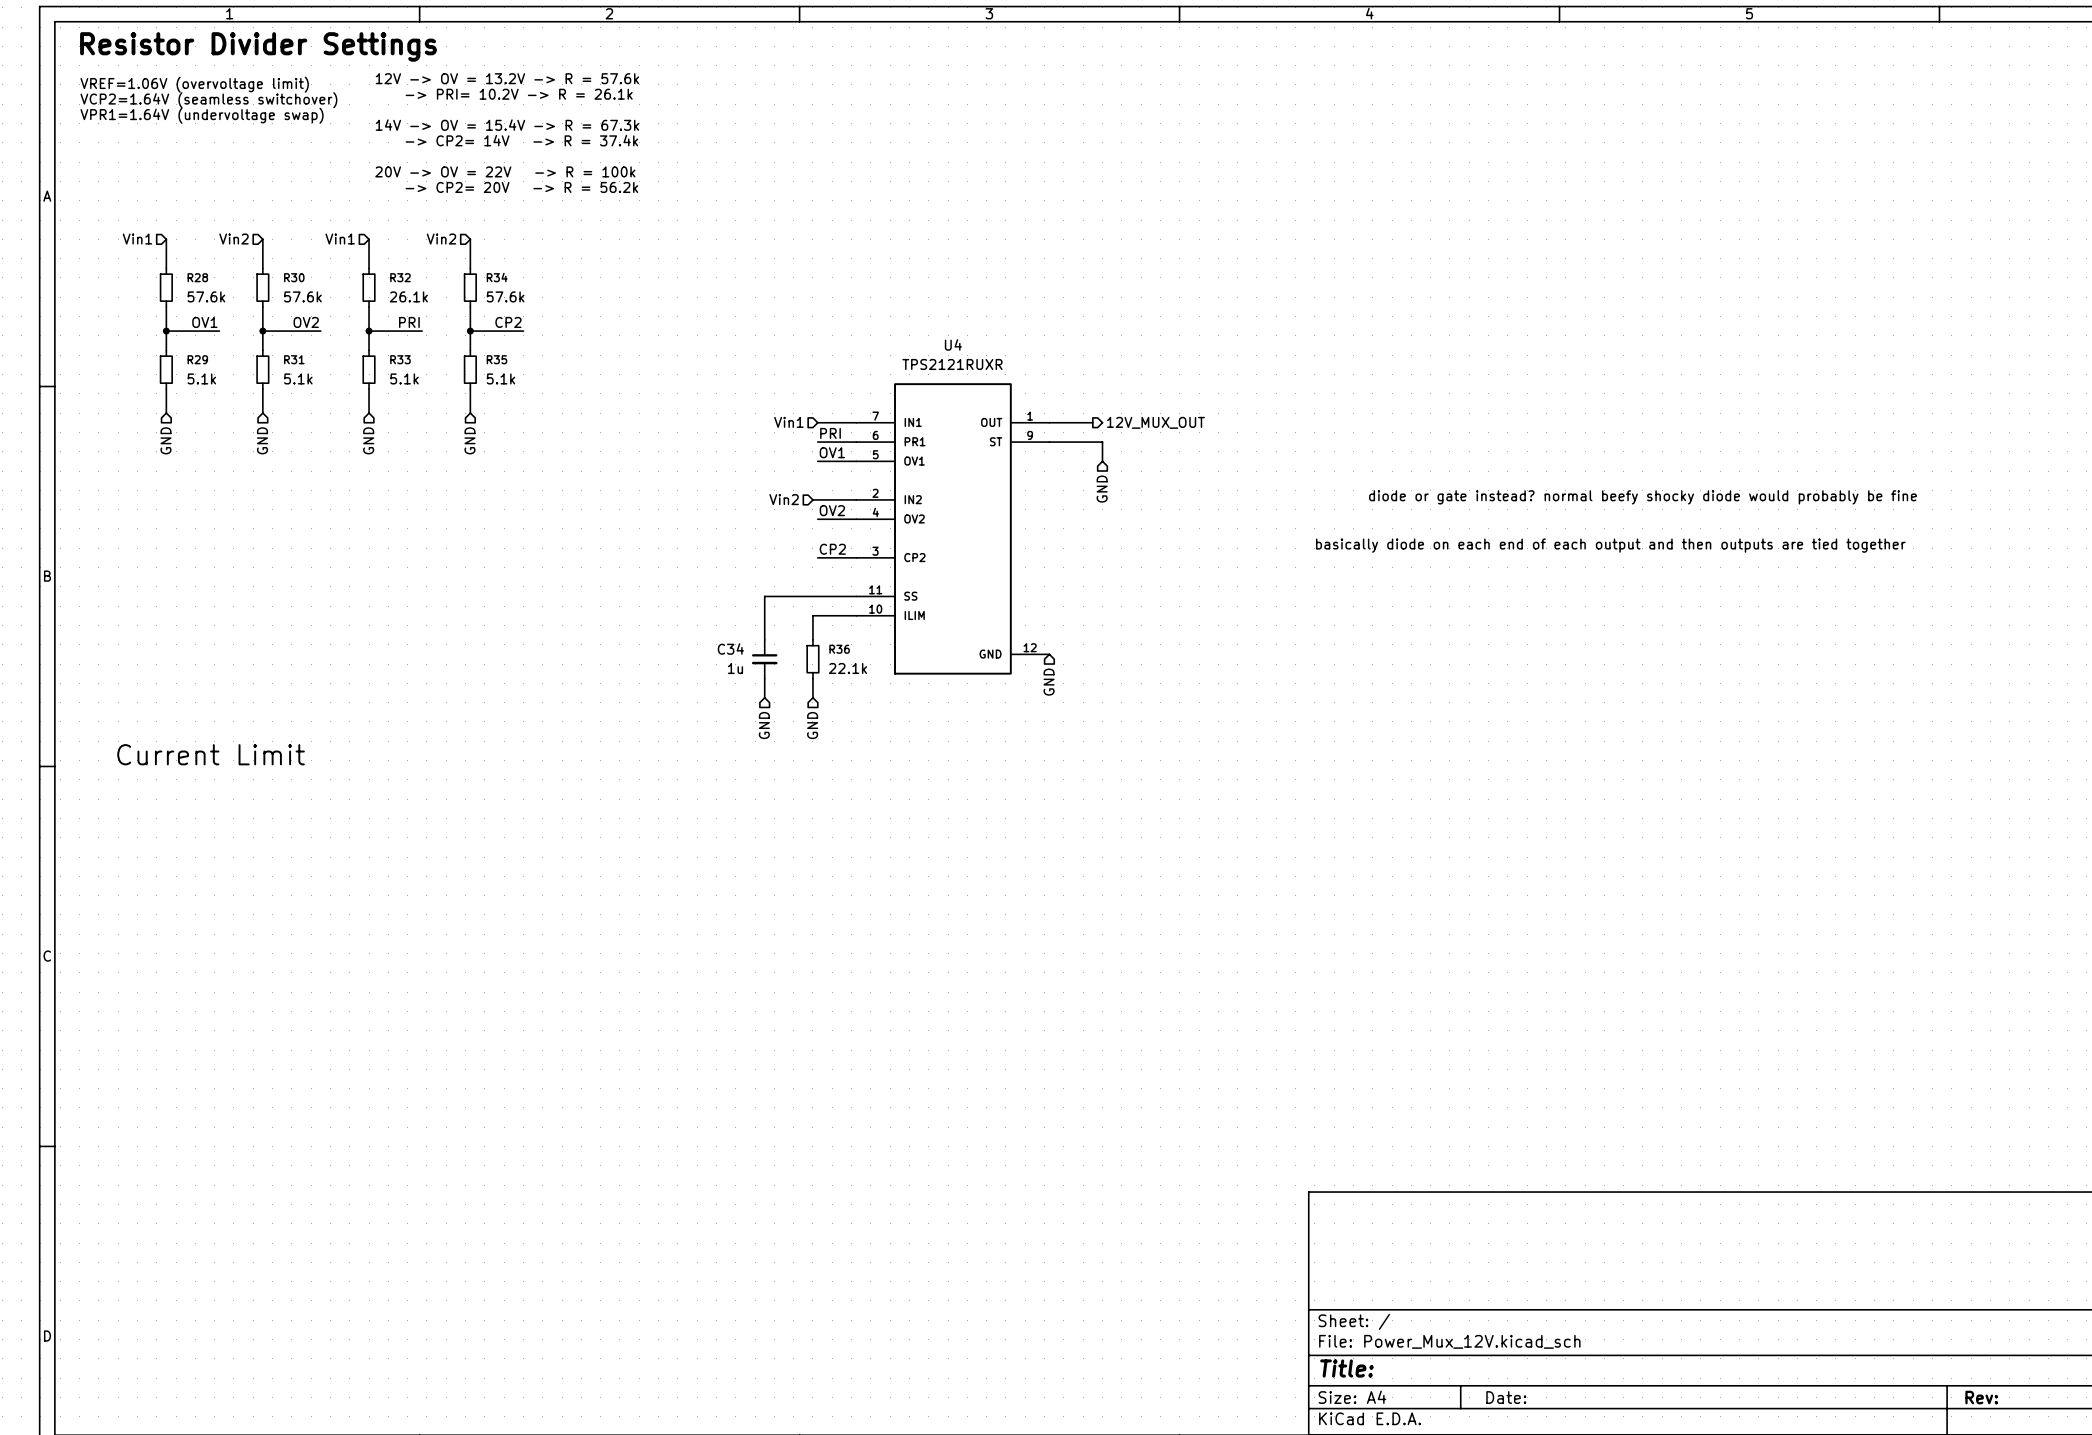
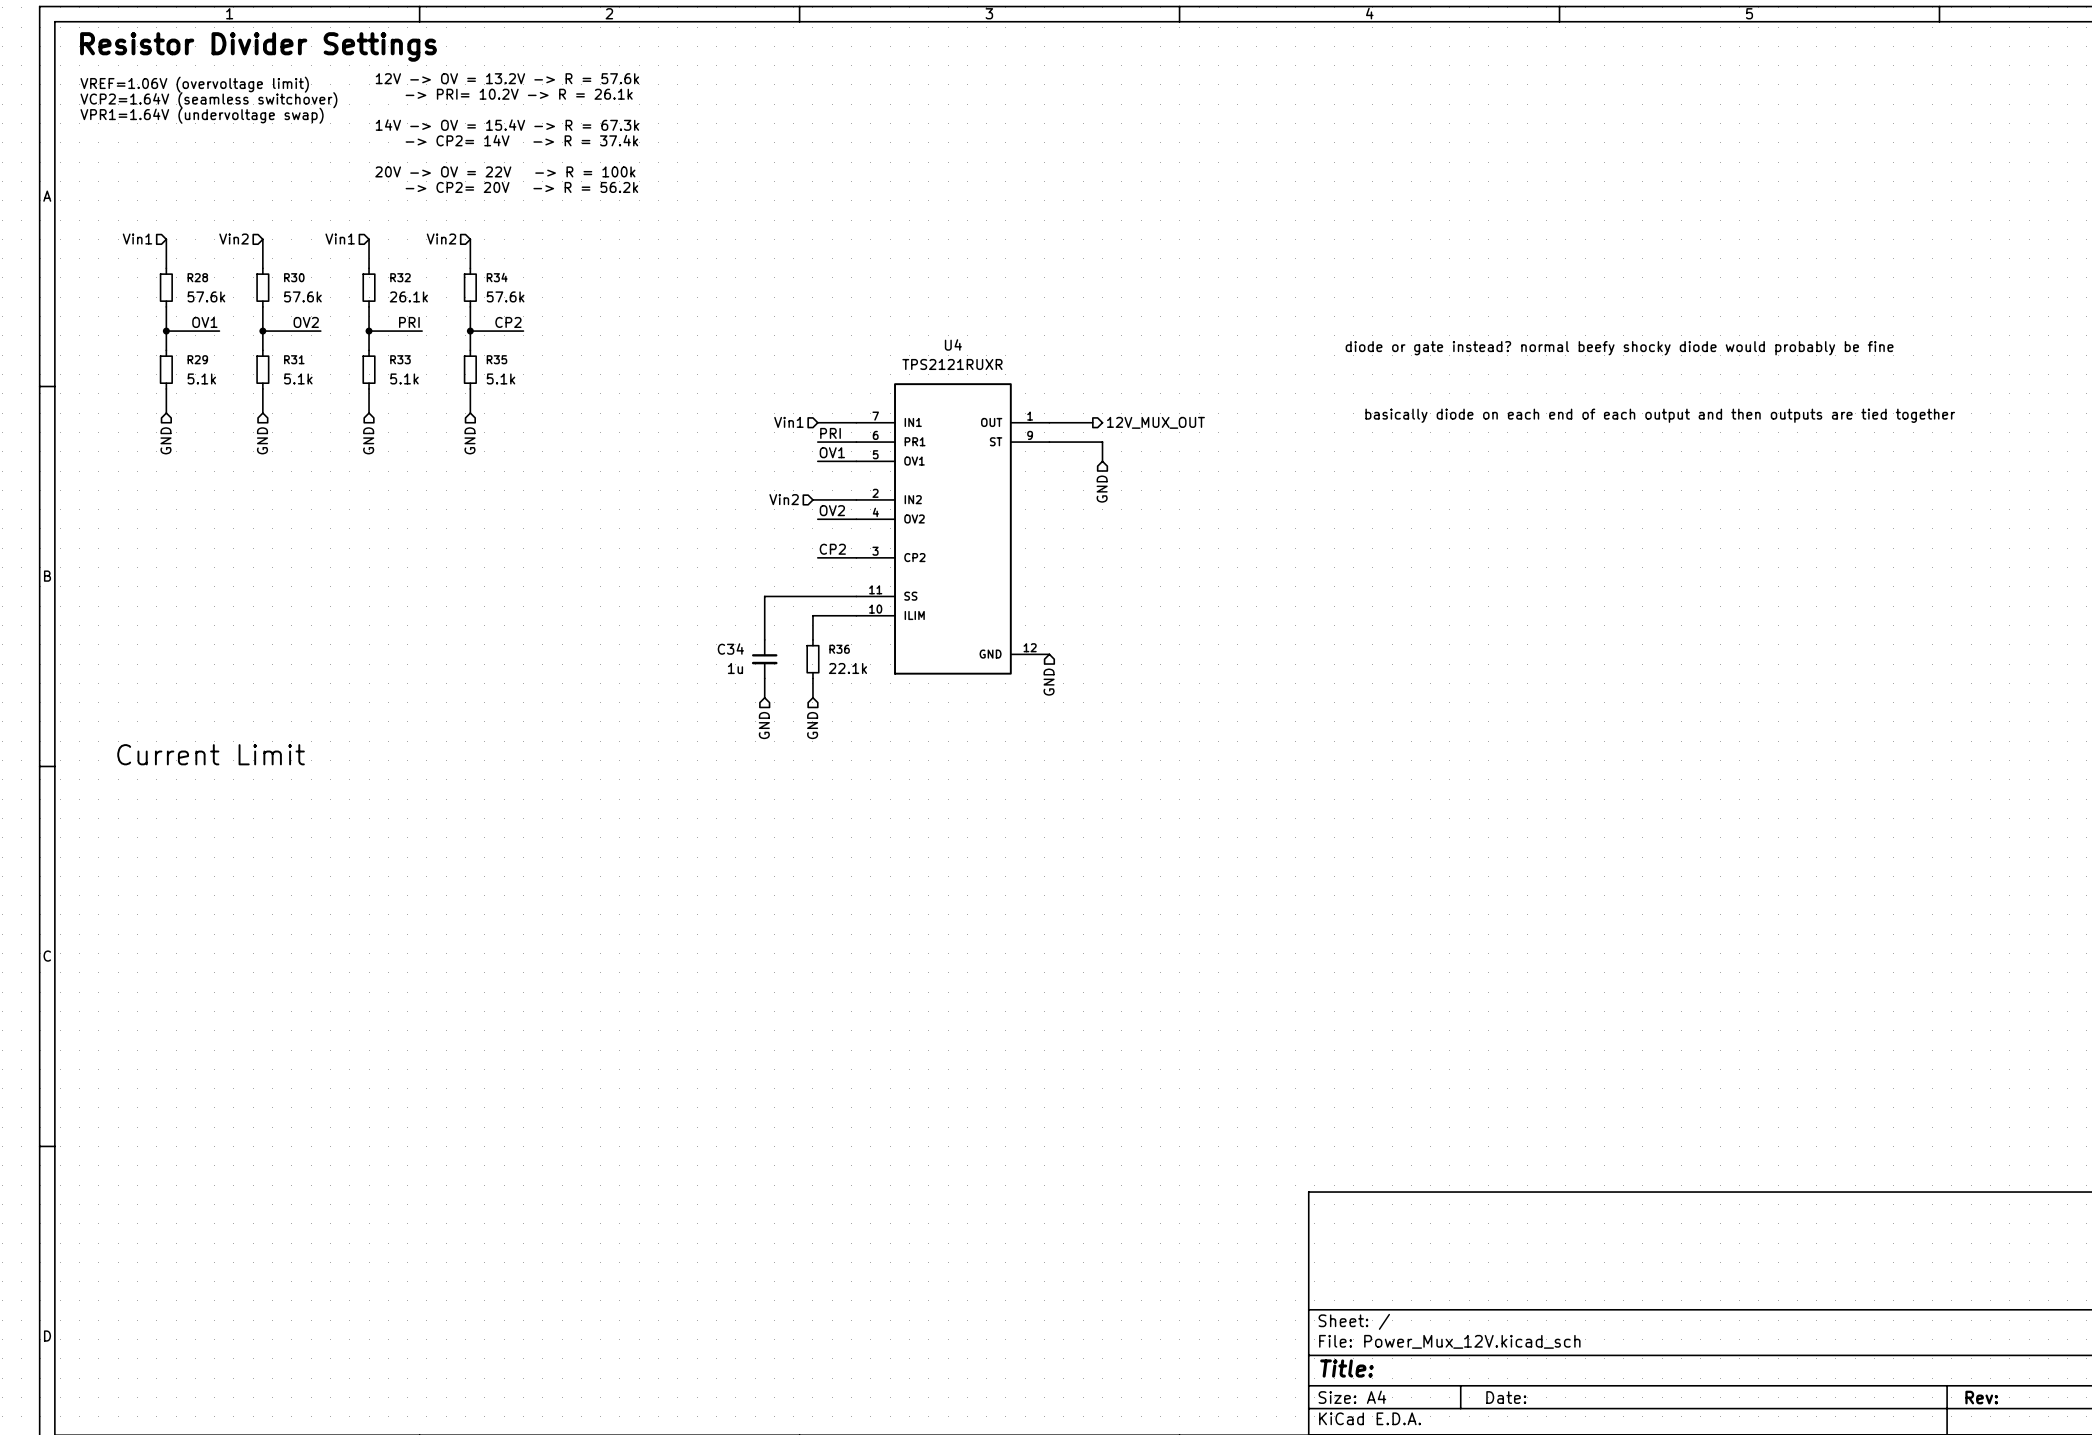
label: none -> diode or gate instead? normal beefy shocky diode would probably be fine (1619, 348)
label: none -> basically diode on each end of each output and then outputs are tied together (1660, 415)
text: diode or gate instead? normal beefy shocky diode would probably be fine (1642, 497) -> none
text: basically diode on each end of each output and then outputs are tied together (1610, 545) -> none

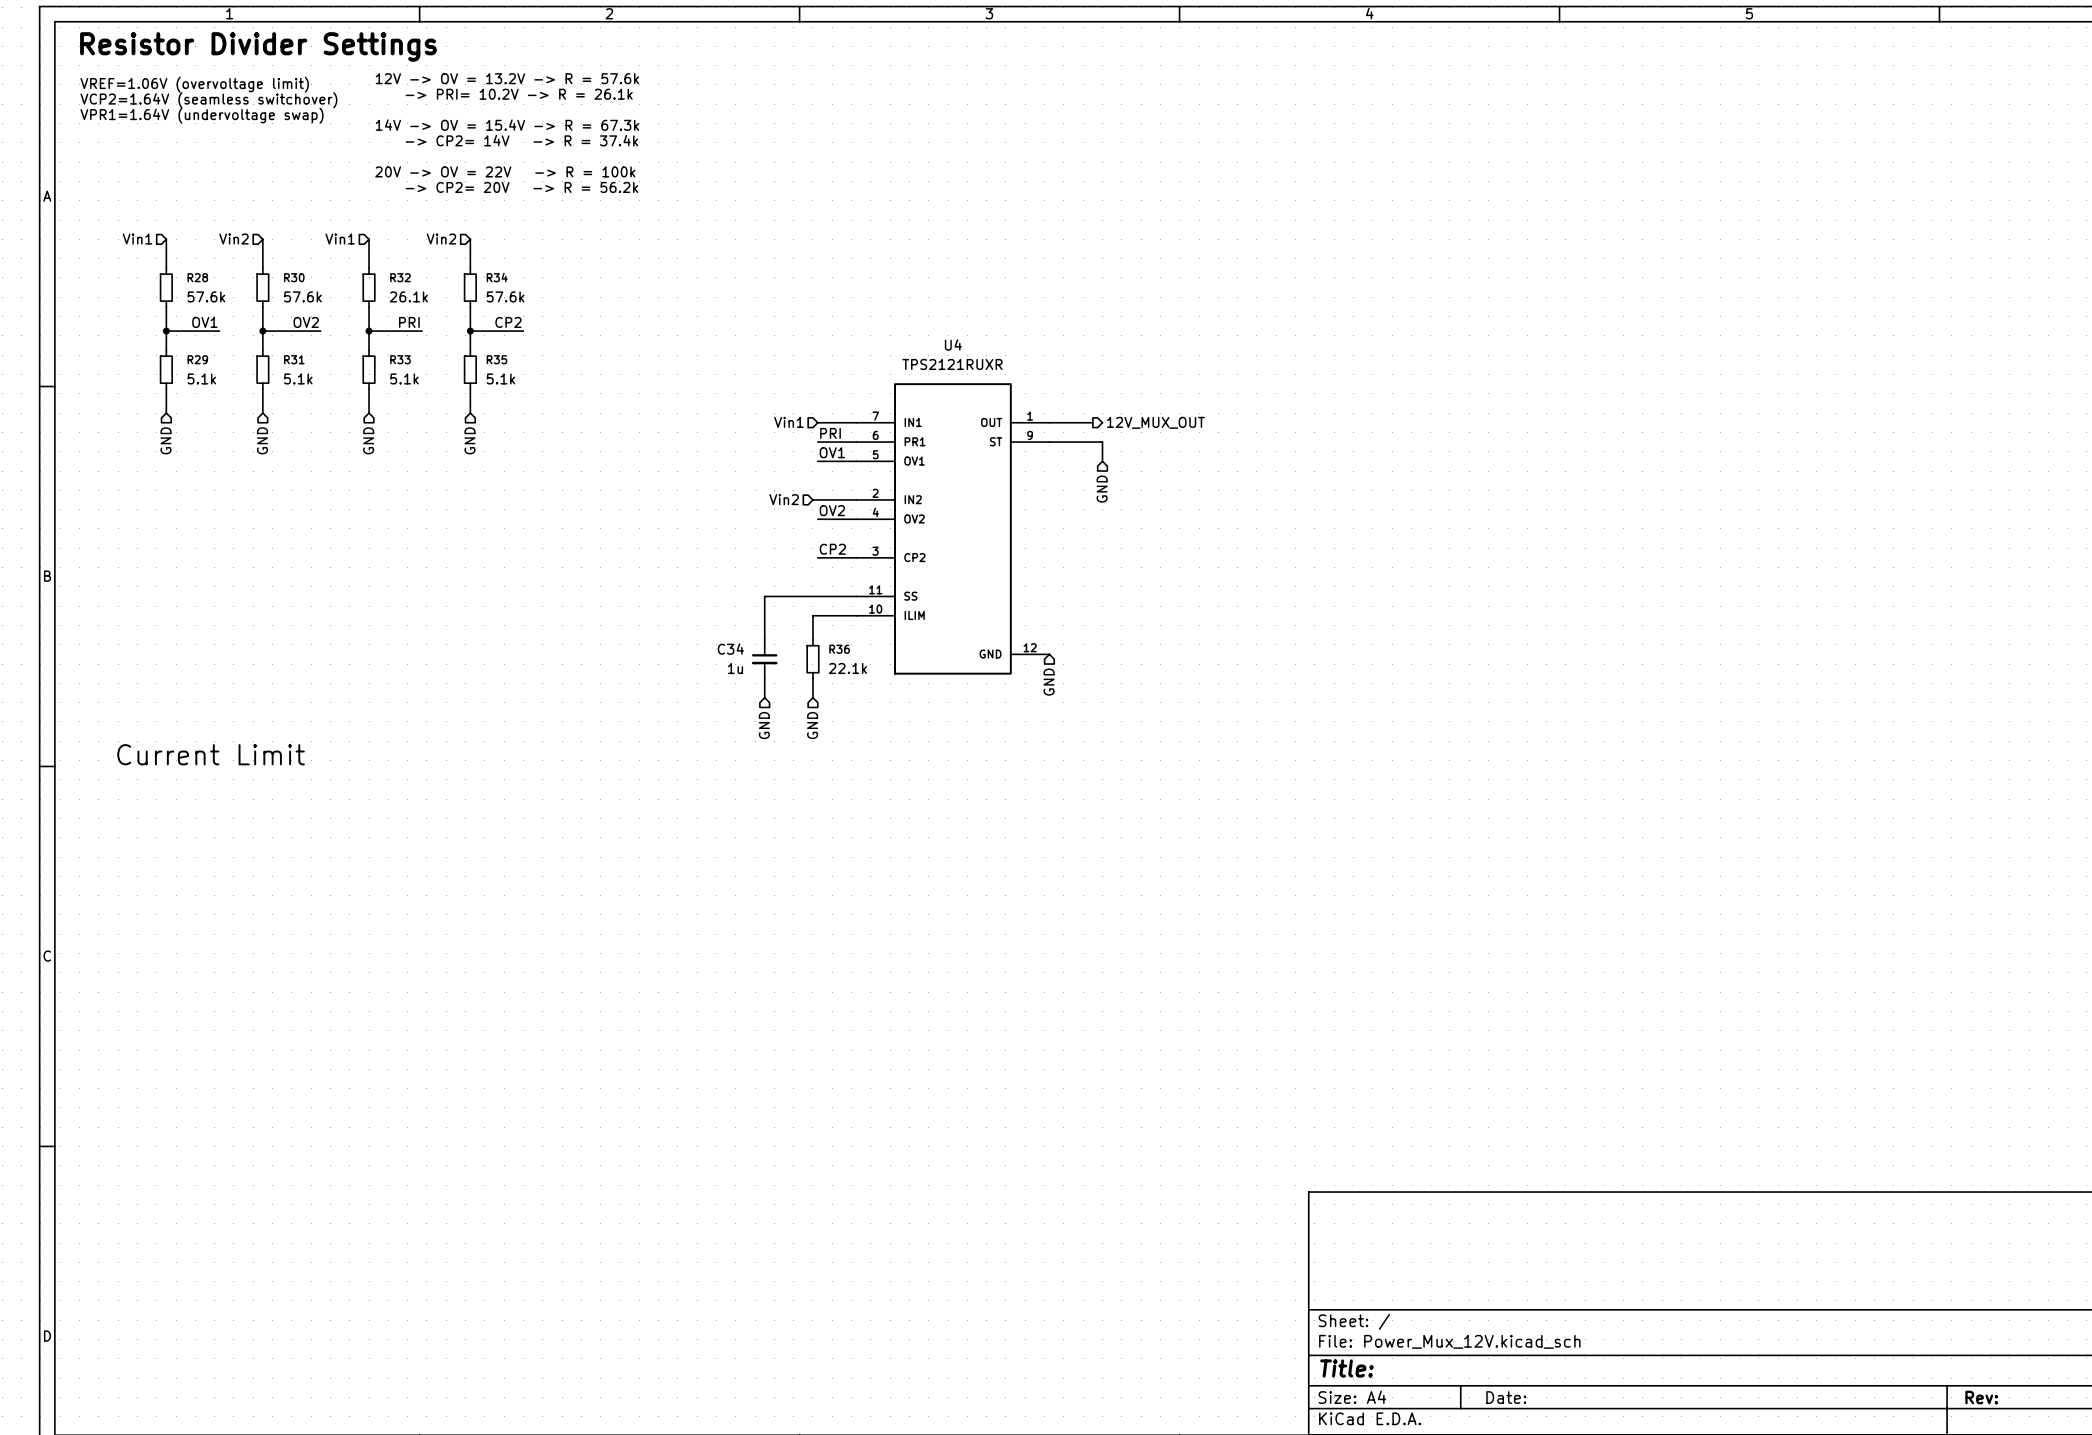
label: diode or gate instead? normal beefy shocky diode would probably be fine (1619, 348) -> none
label: basically diode on each end of each output and then outputs are tied together (1660, 415) -> none

